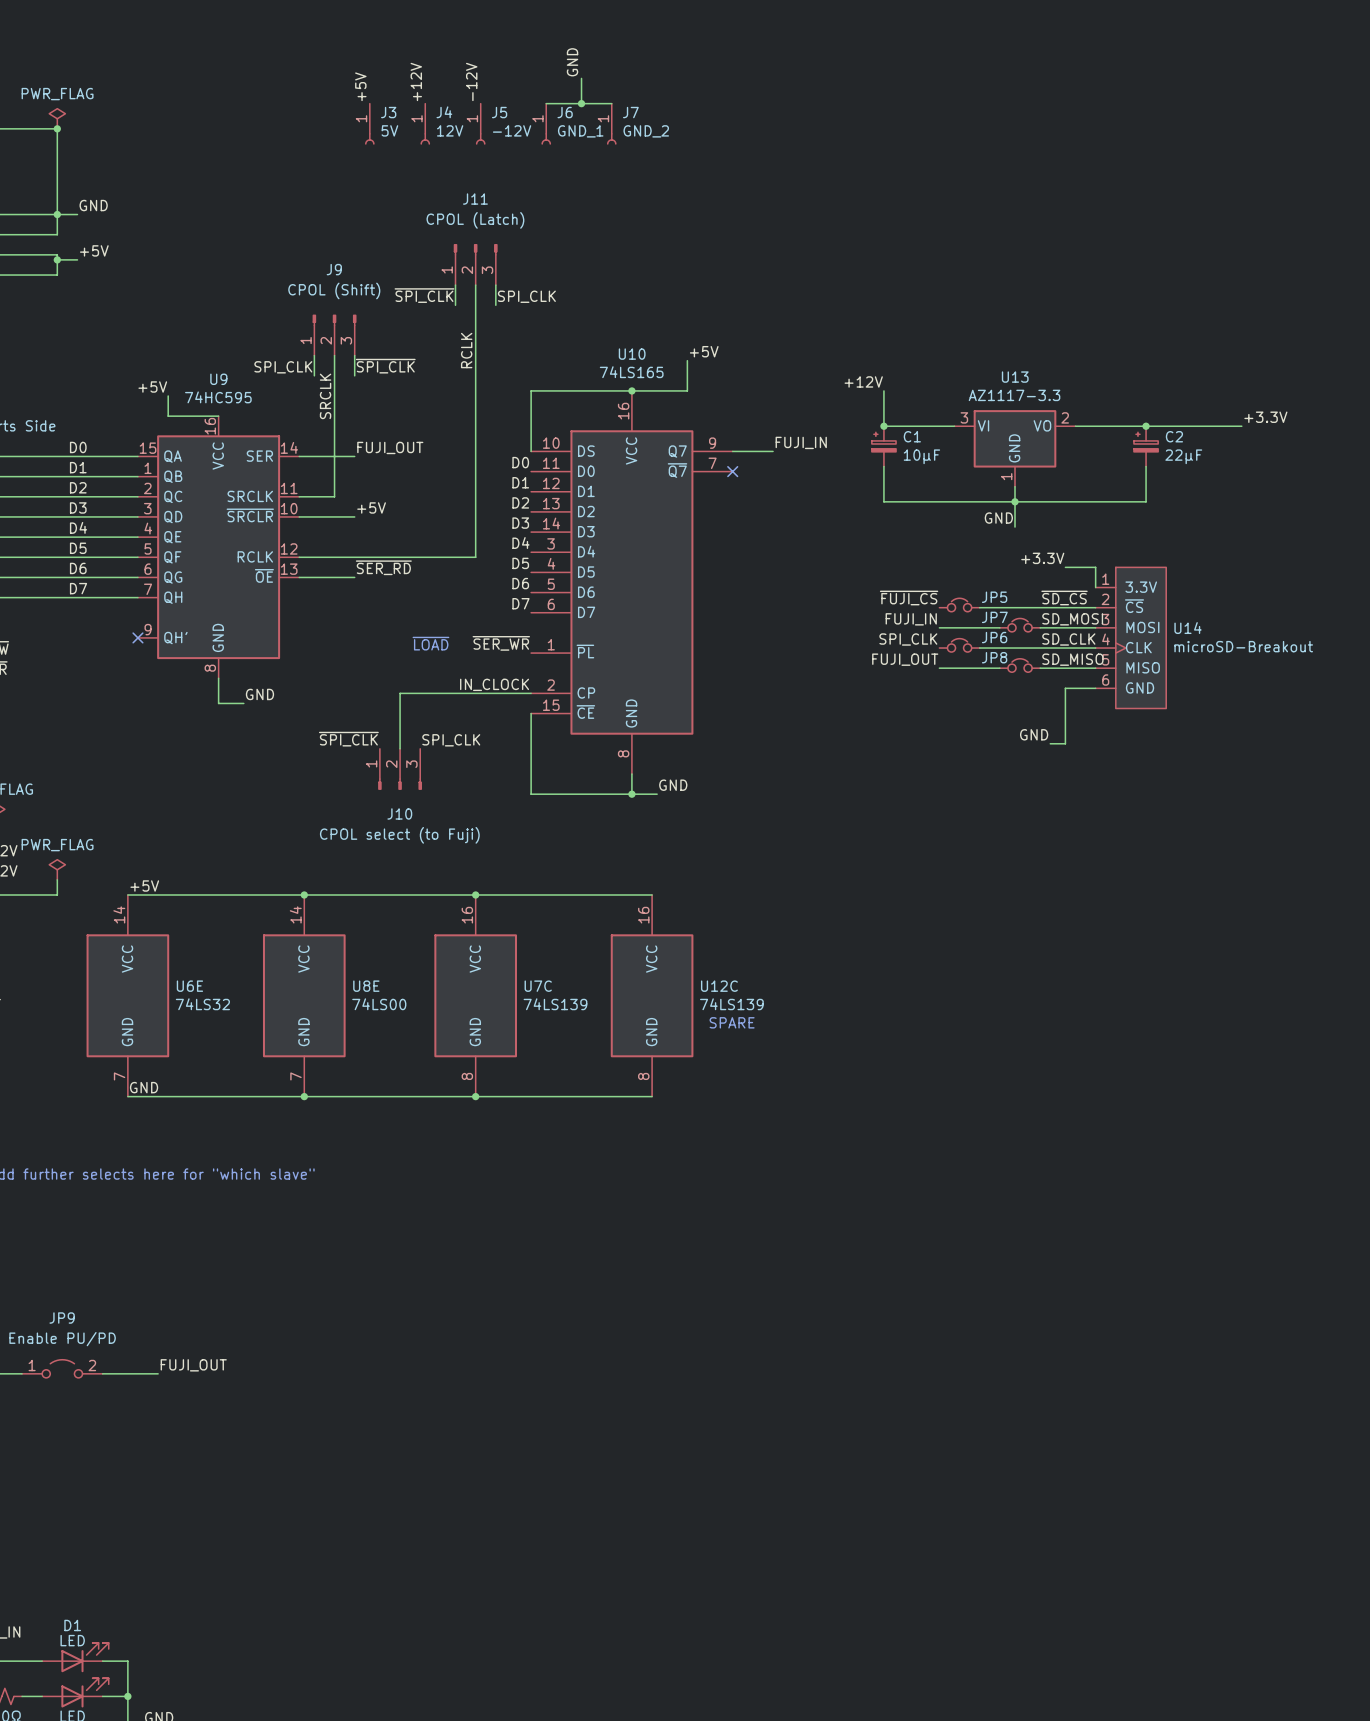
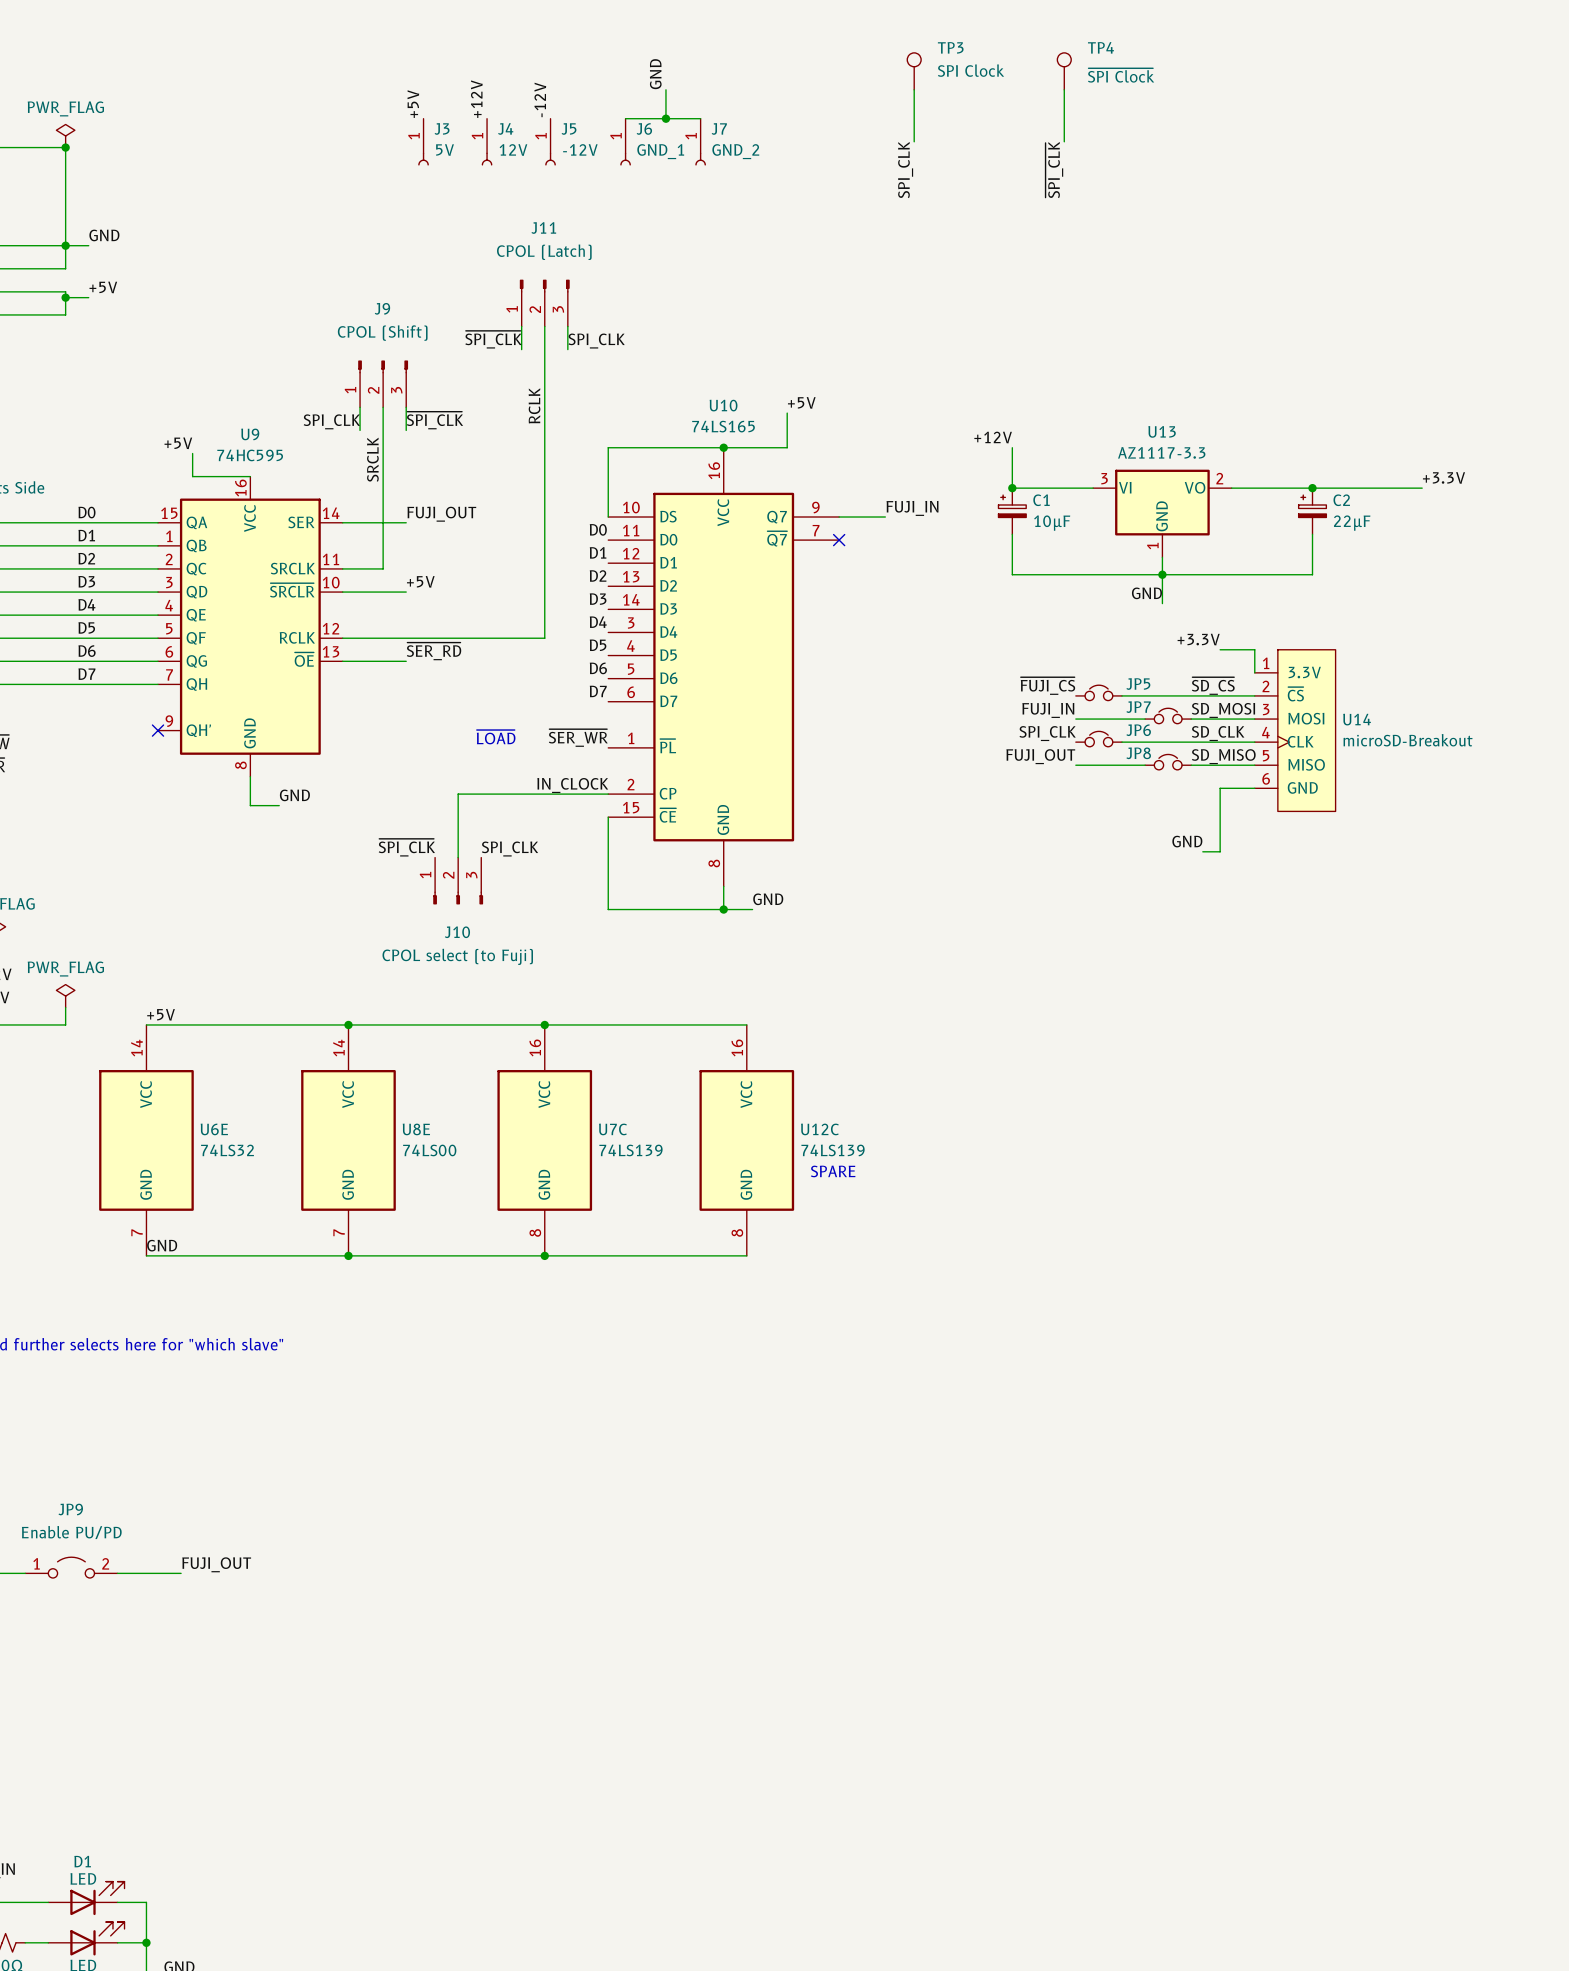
TP3: none -> SPI Clock (914, 71)
TP4: none -> ~{SPI Clock} (1064, 71)
wire: none -> (914, 89) (914, 141)
wire: none -> (1064, 89) (1064, 141)
label: none -> SPI_CLK (905, 170)
label: none -> ~{SPI_CLK} (1054, 170)

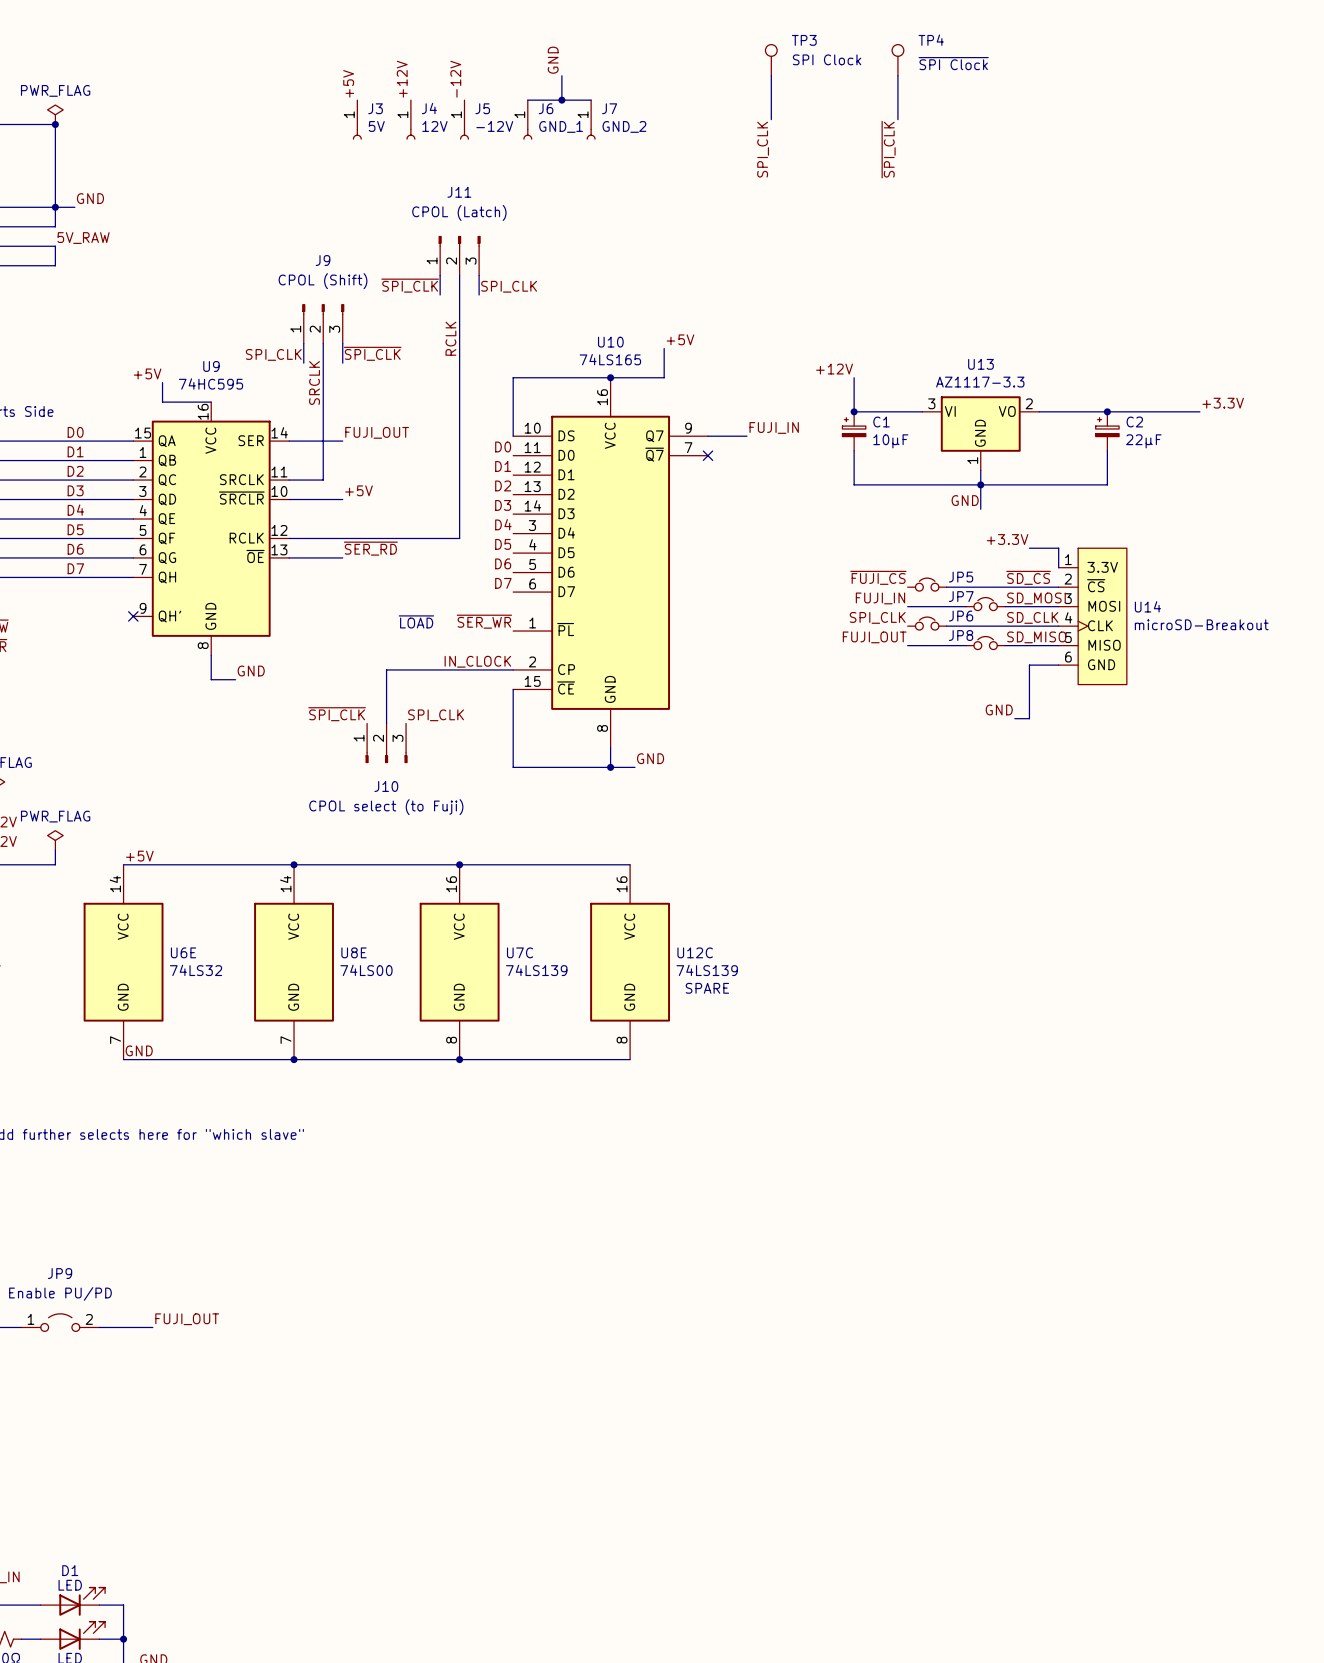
label: none -> 5V_RAW (83, 238)
label: +5V (103, 287) -> none
wire: (65, 297) (88, 297) -> none
junction: (65, 297) -> none

